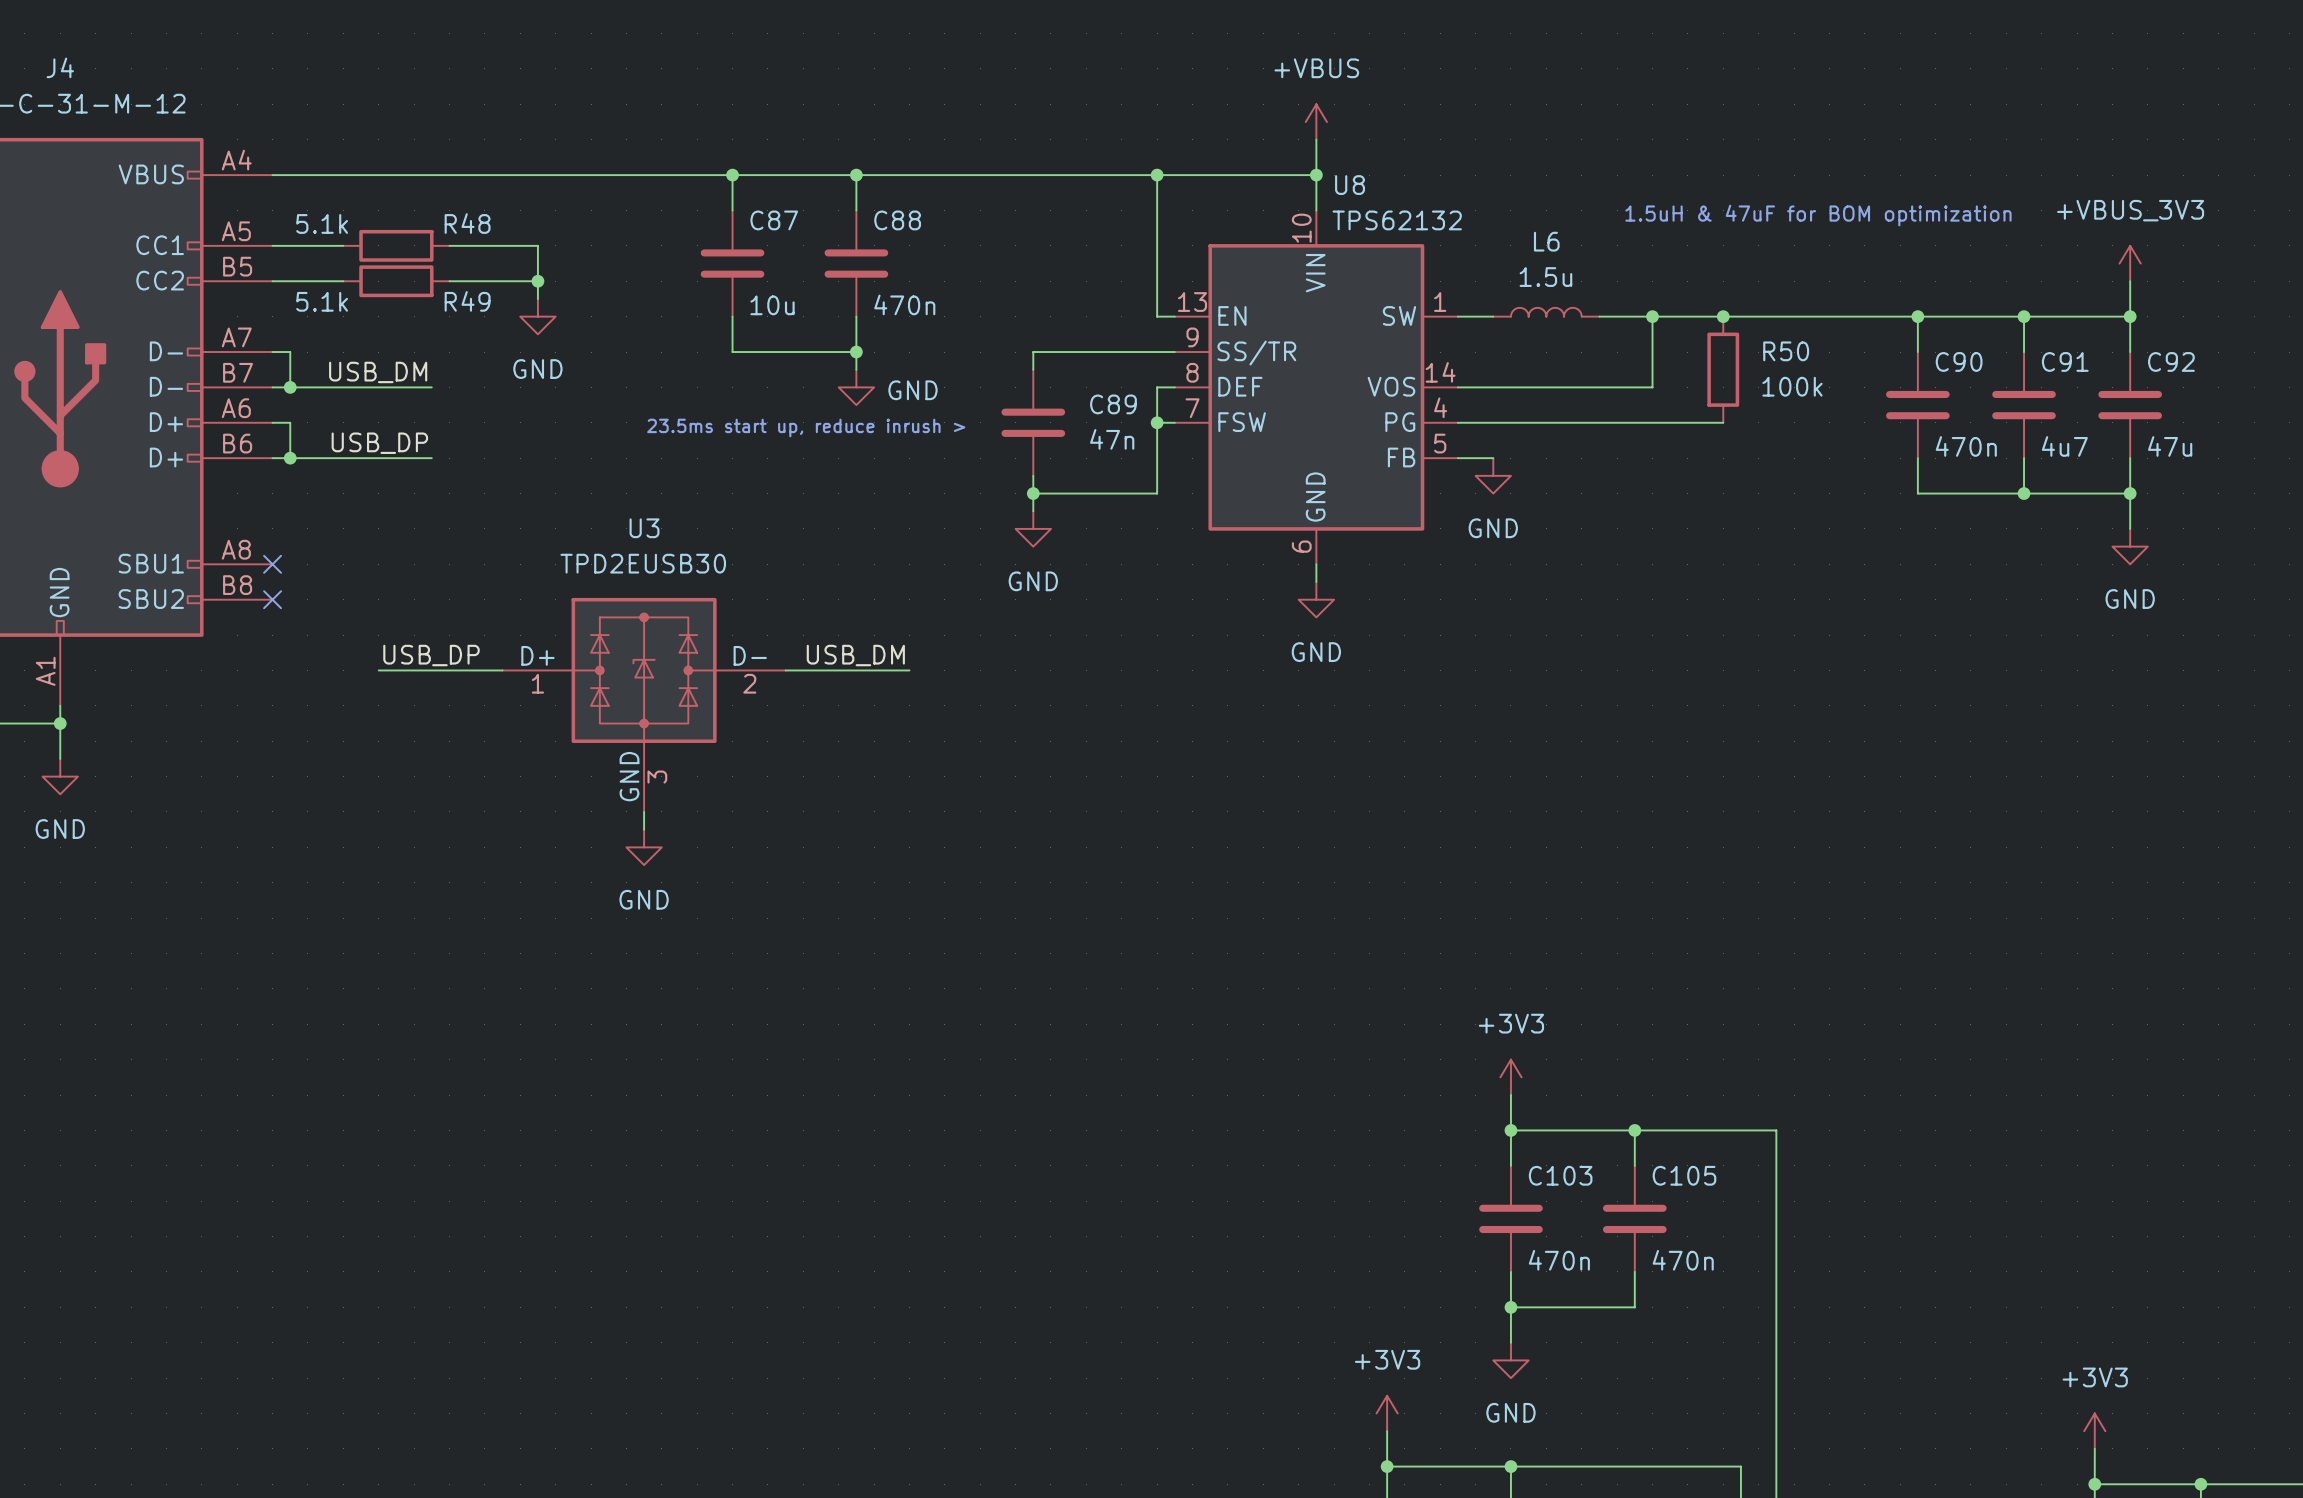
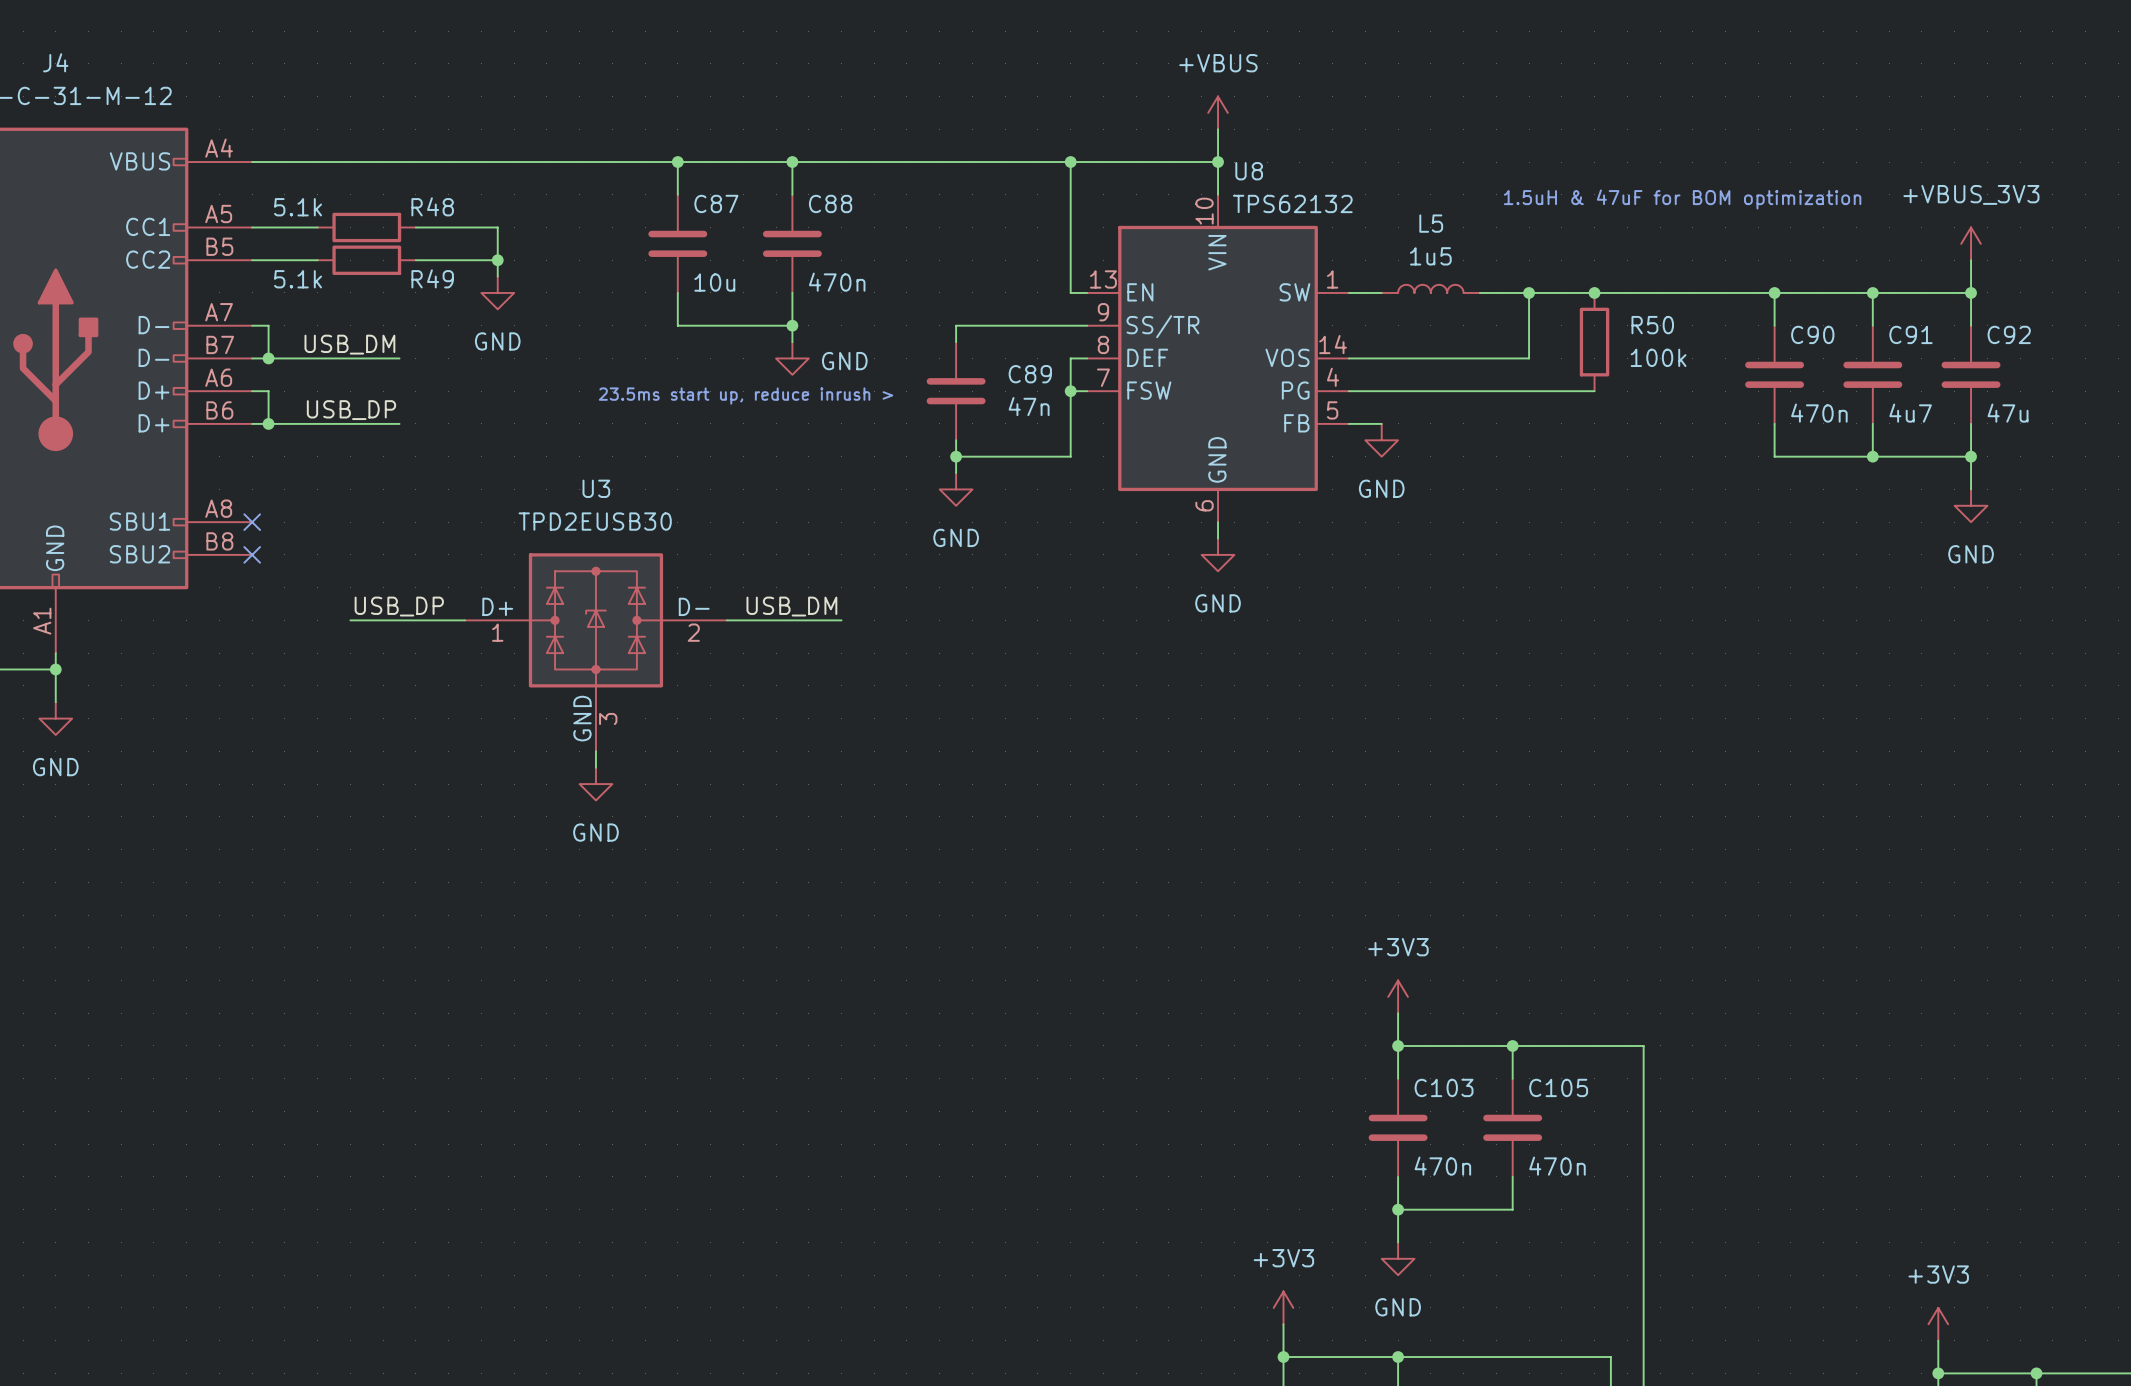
L6 name: L6 (1546, 241) -> L5 (1431, 223)
L6 value: 1.5u (1545, 277) -> 1u5 (1430, 256)

